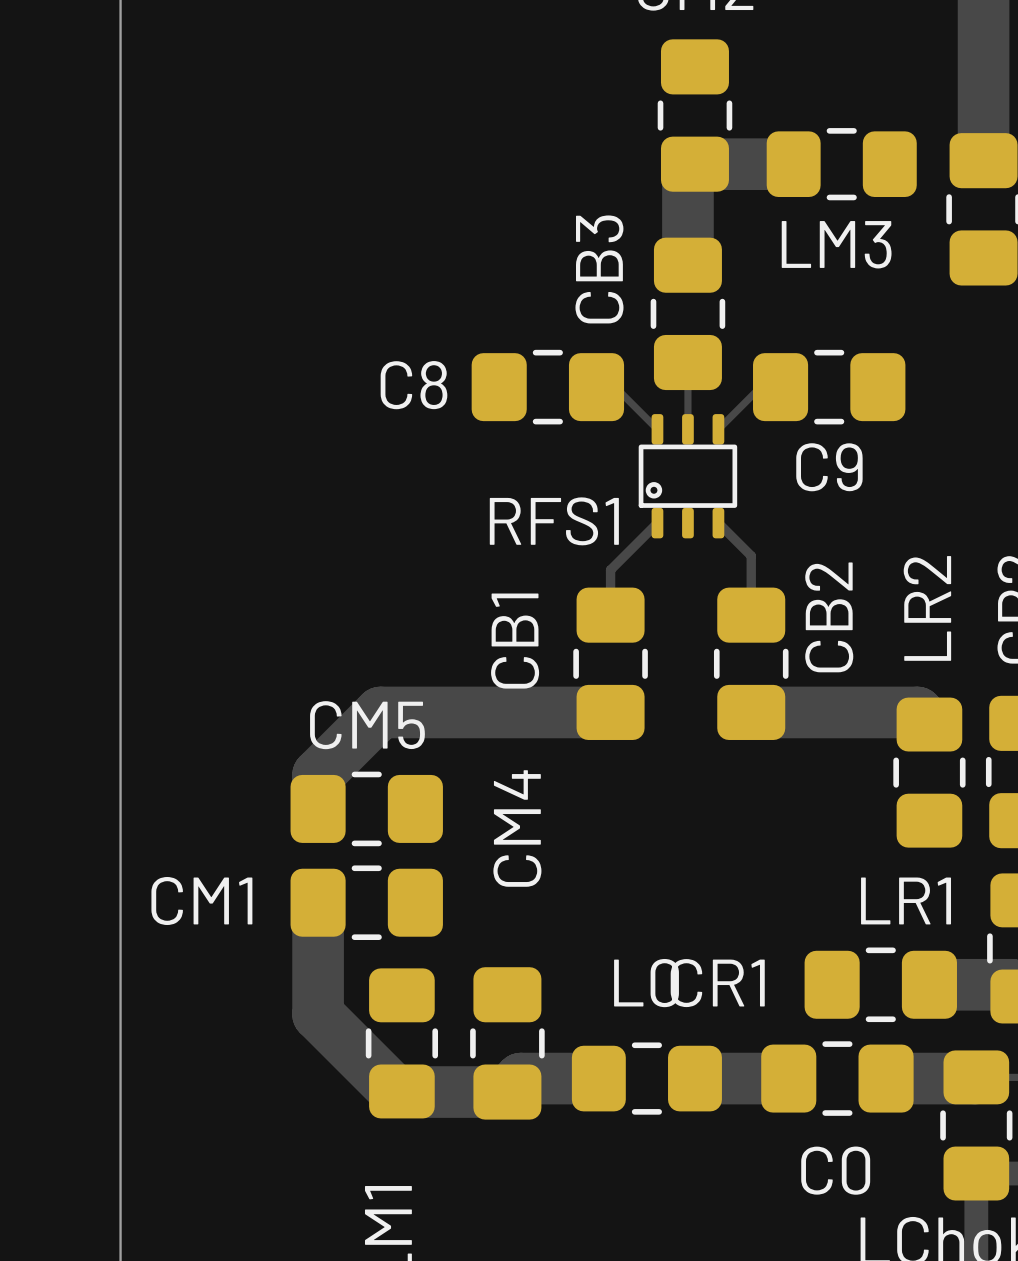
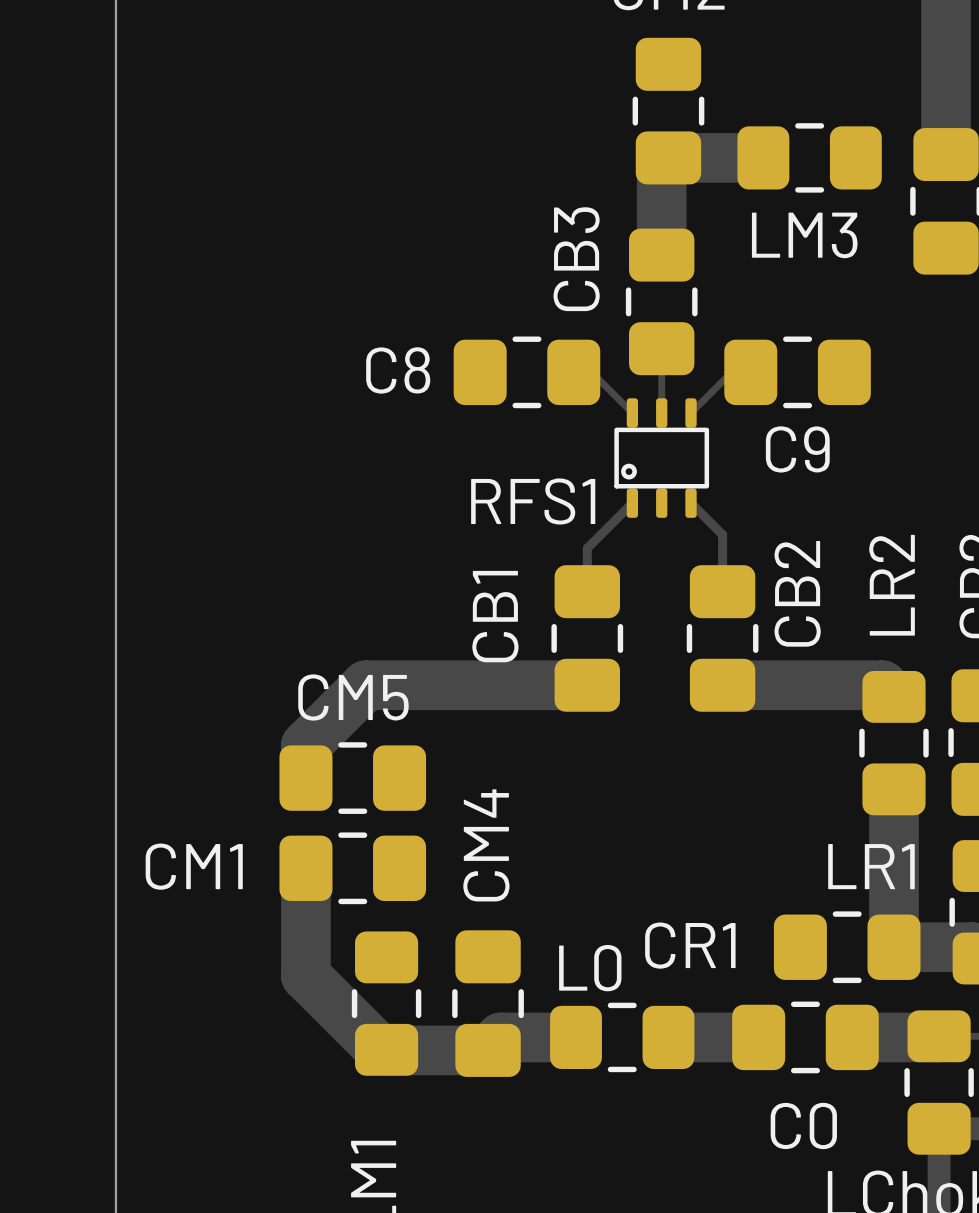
track: none -> (893, 789) (893, 947)
CM4 name position: CM4 (517, 828) -> CM4 (486, 845)
L0 name position: L0 (646, 983) -> L0 (590, 968)

